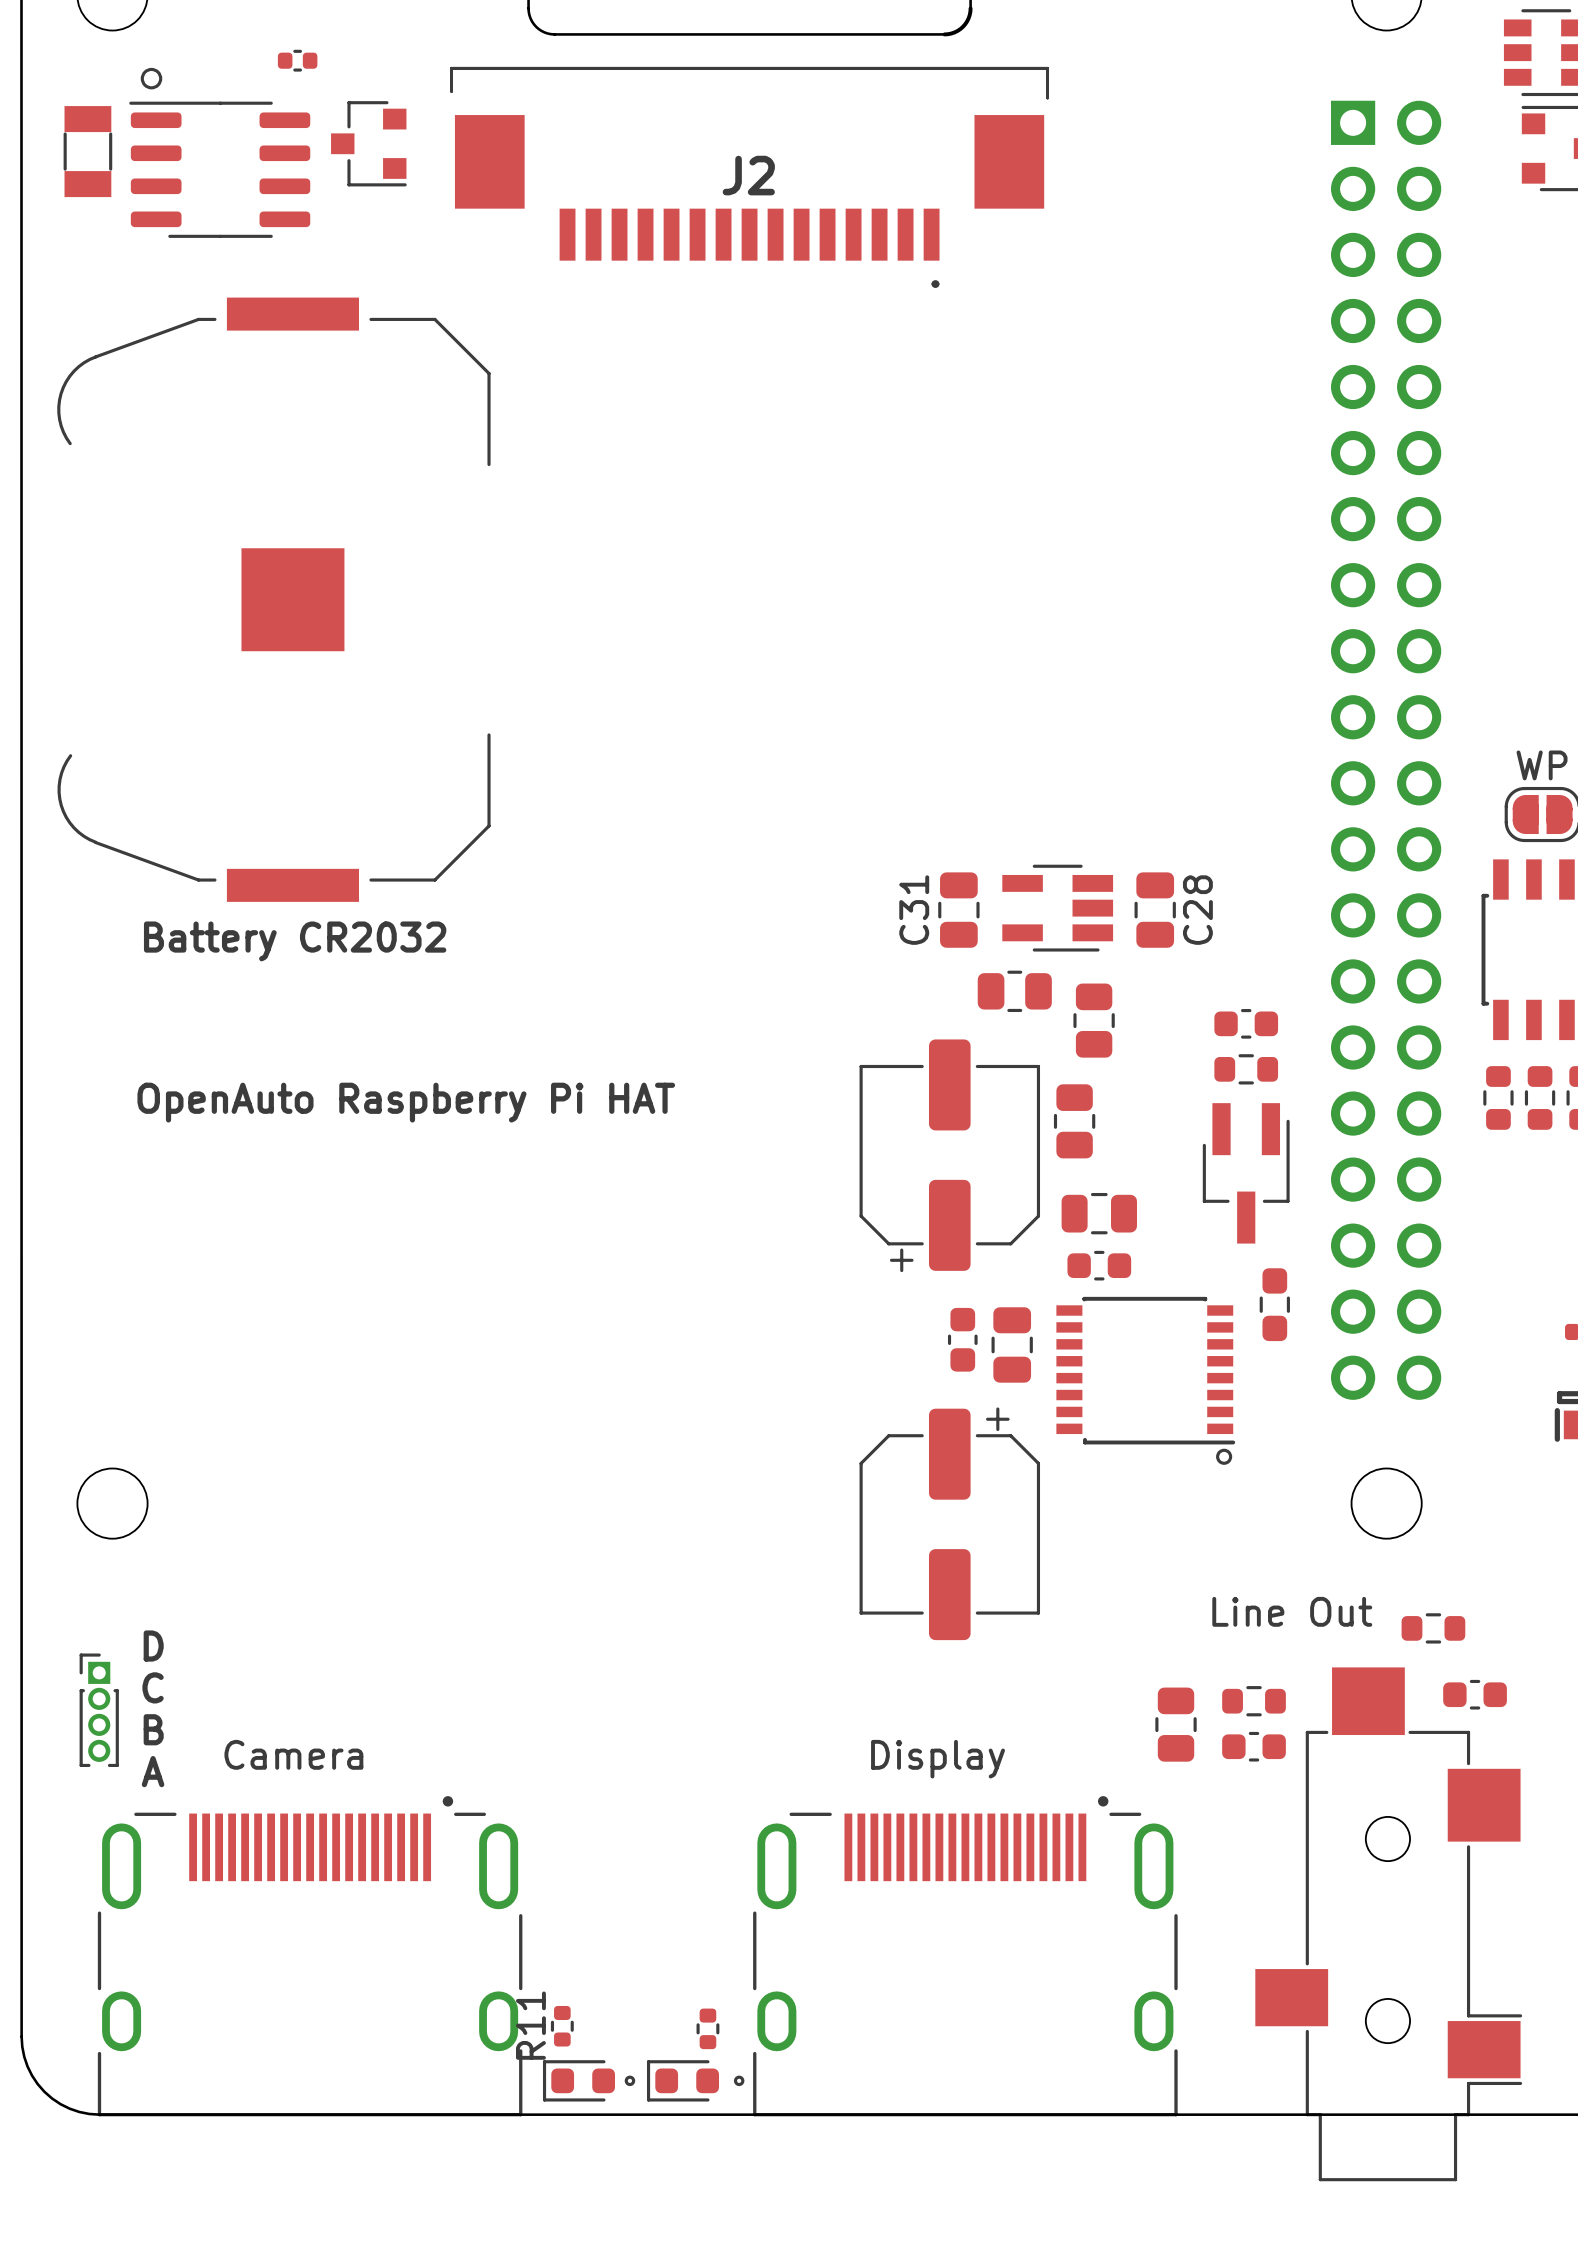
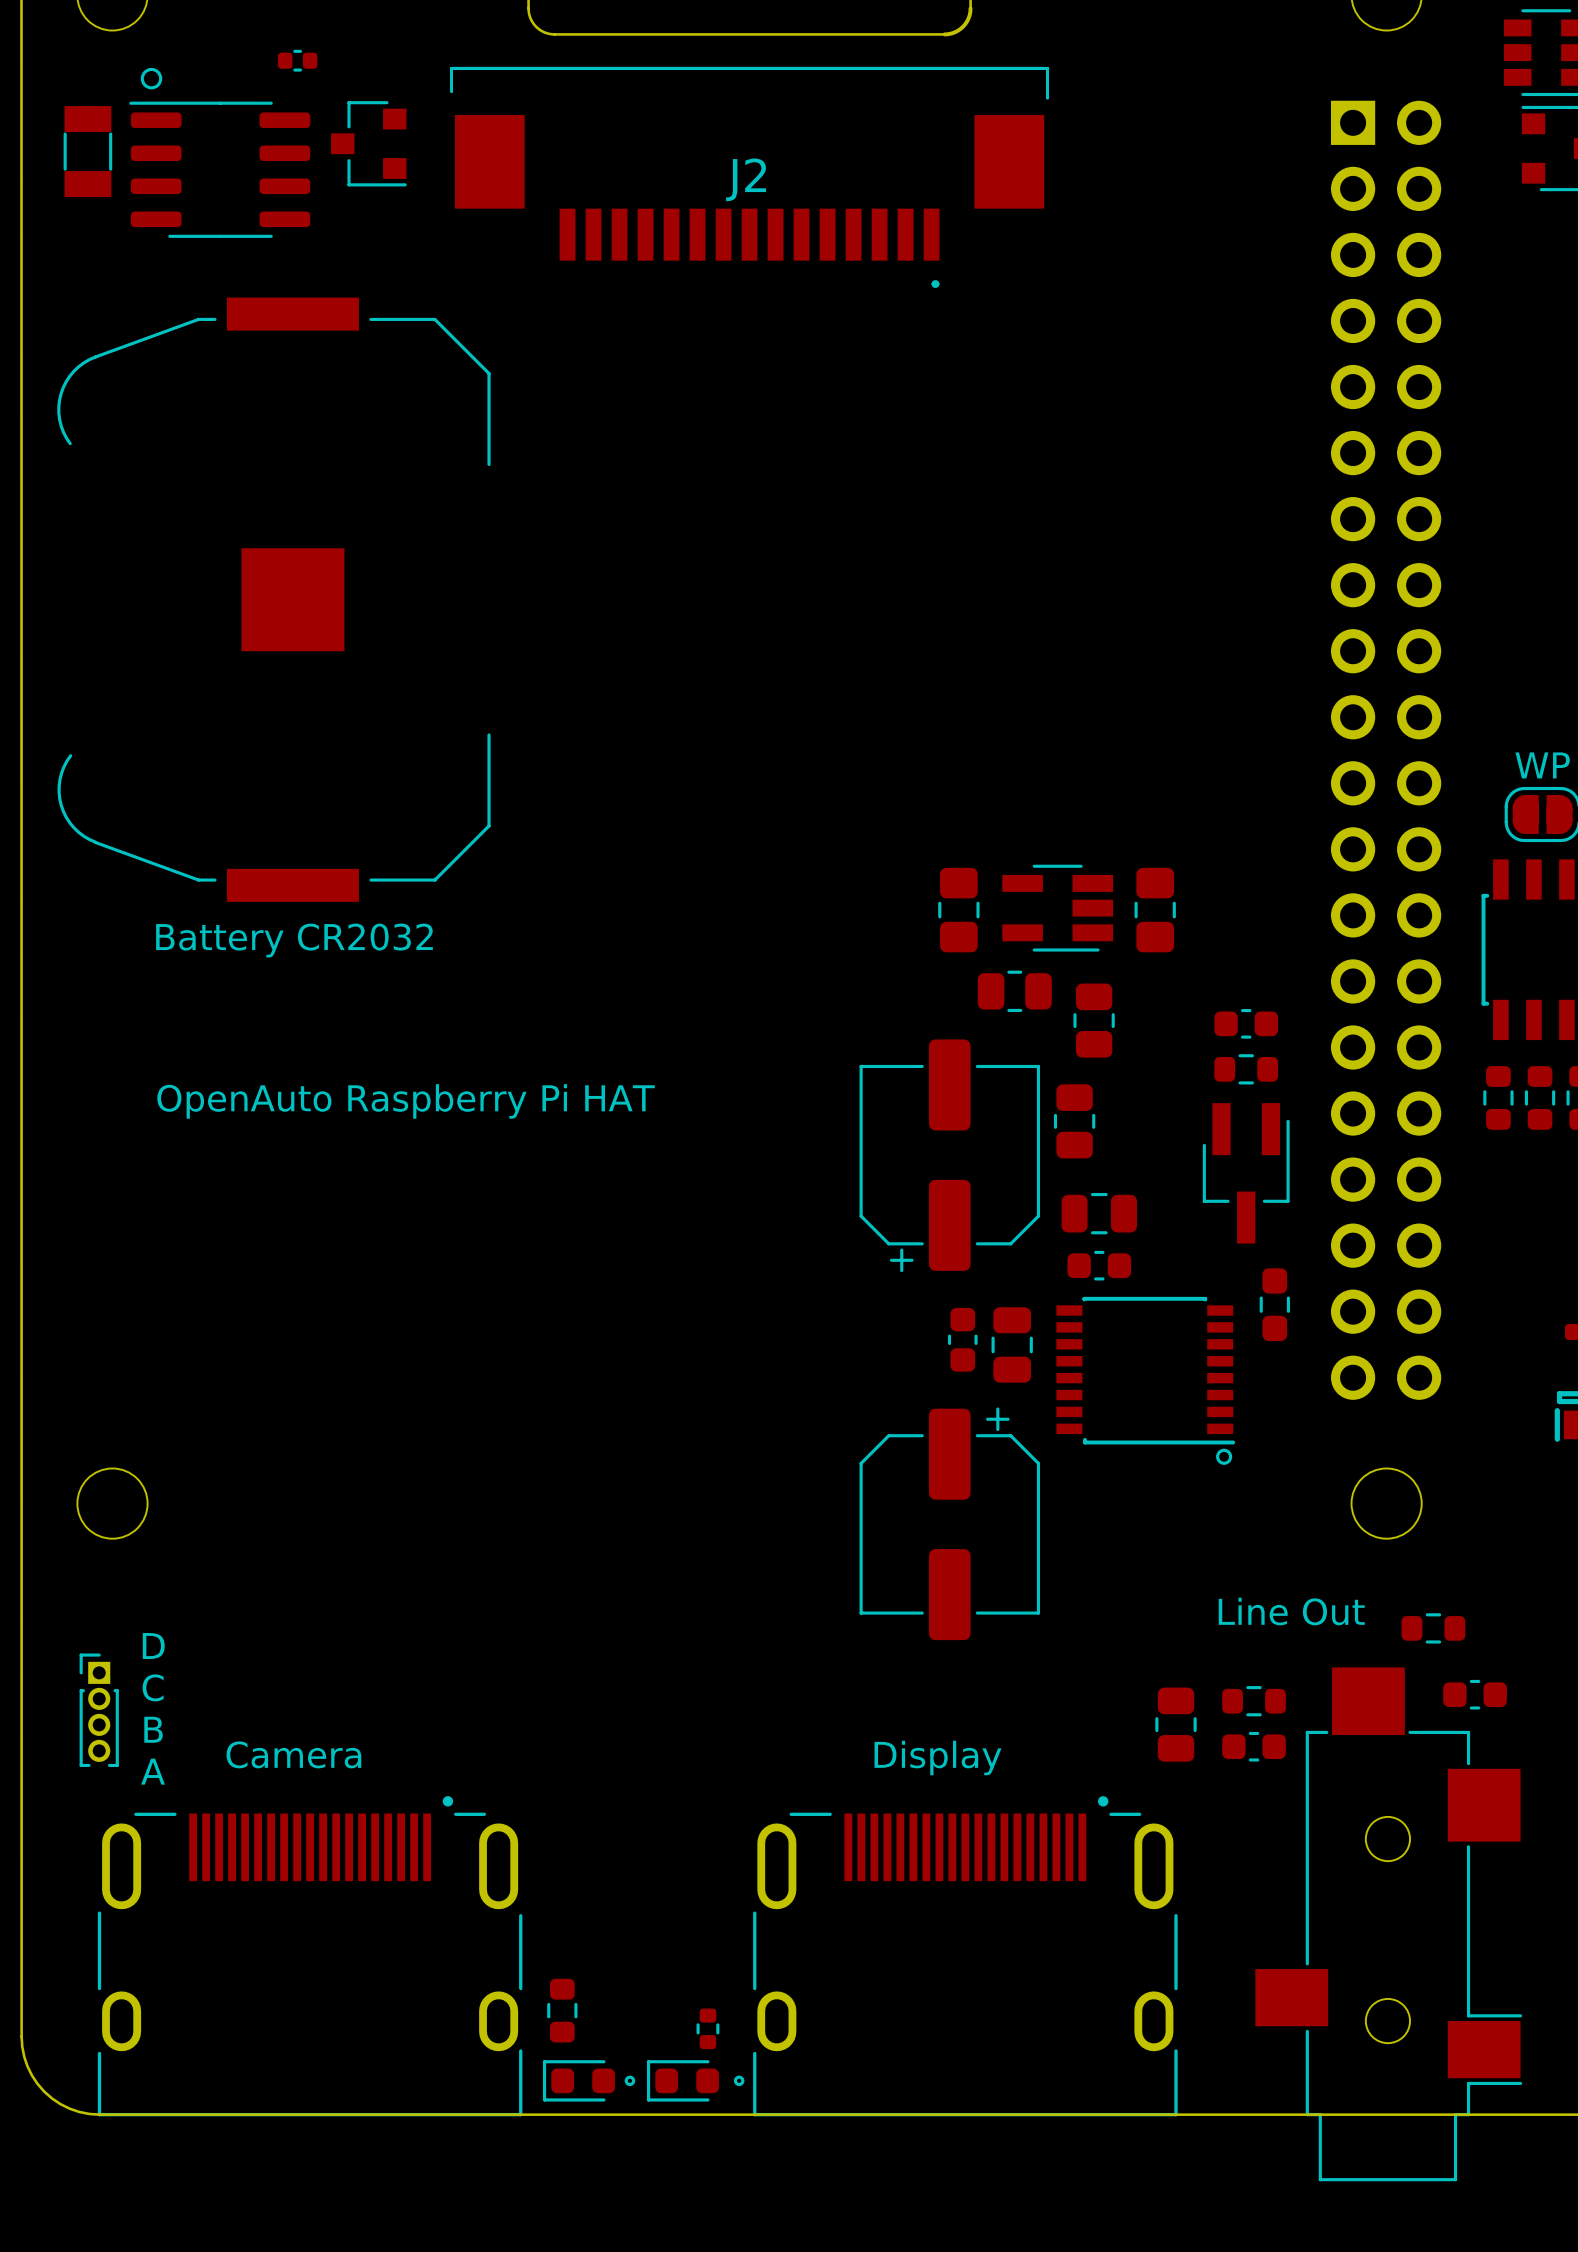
C31: (958, 910) -> none
part: none -> (958, 910)
C28: (1155, 910) -> none
part: none -> (1155, 910)
part: none -> (562, 2010)
R11: (562, 2026) -> none

